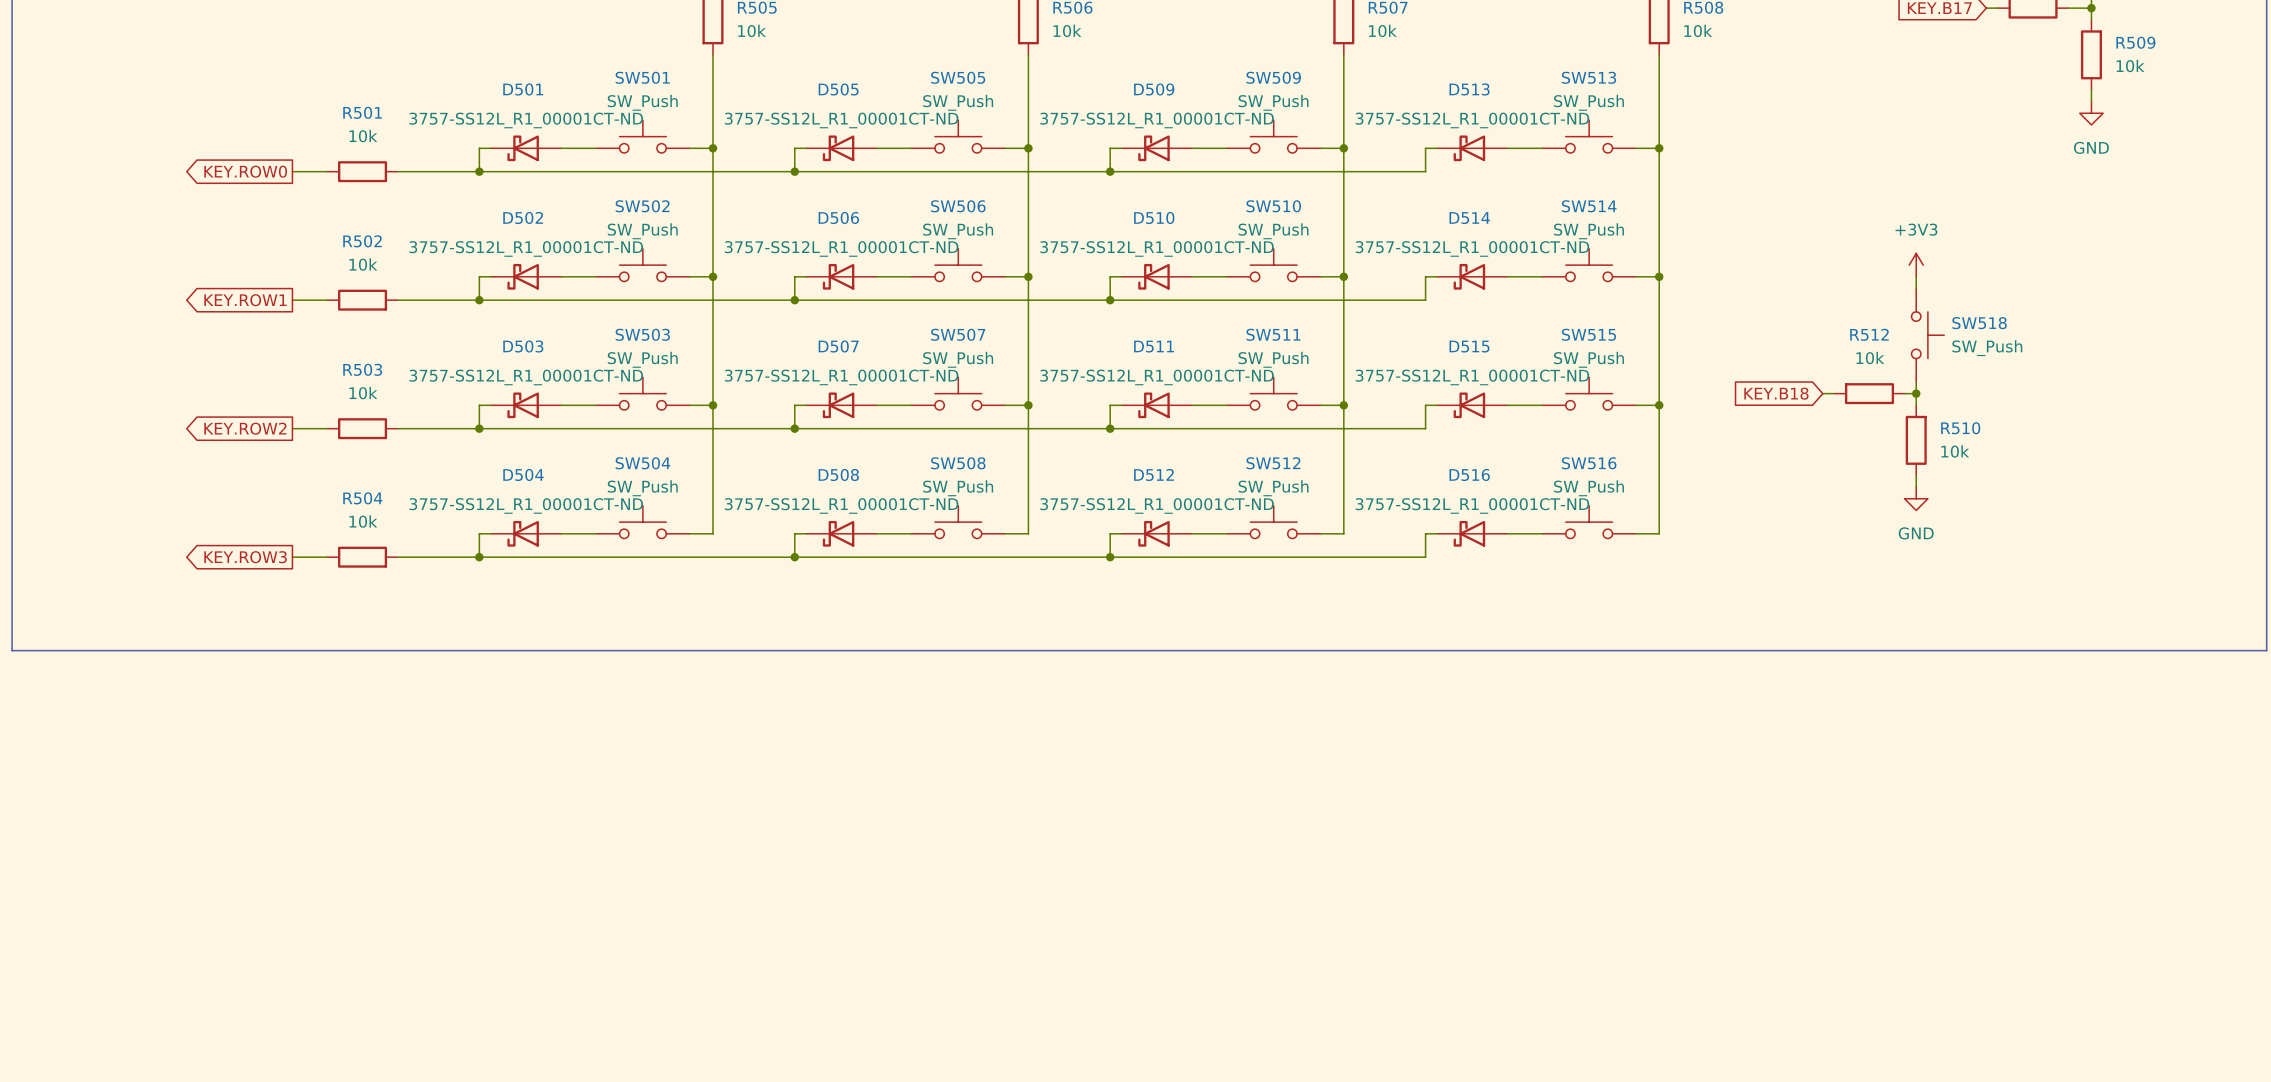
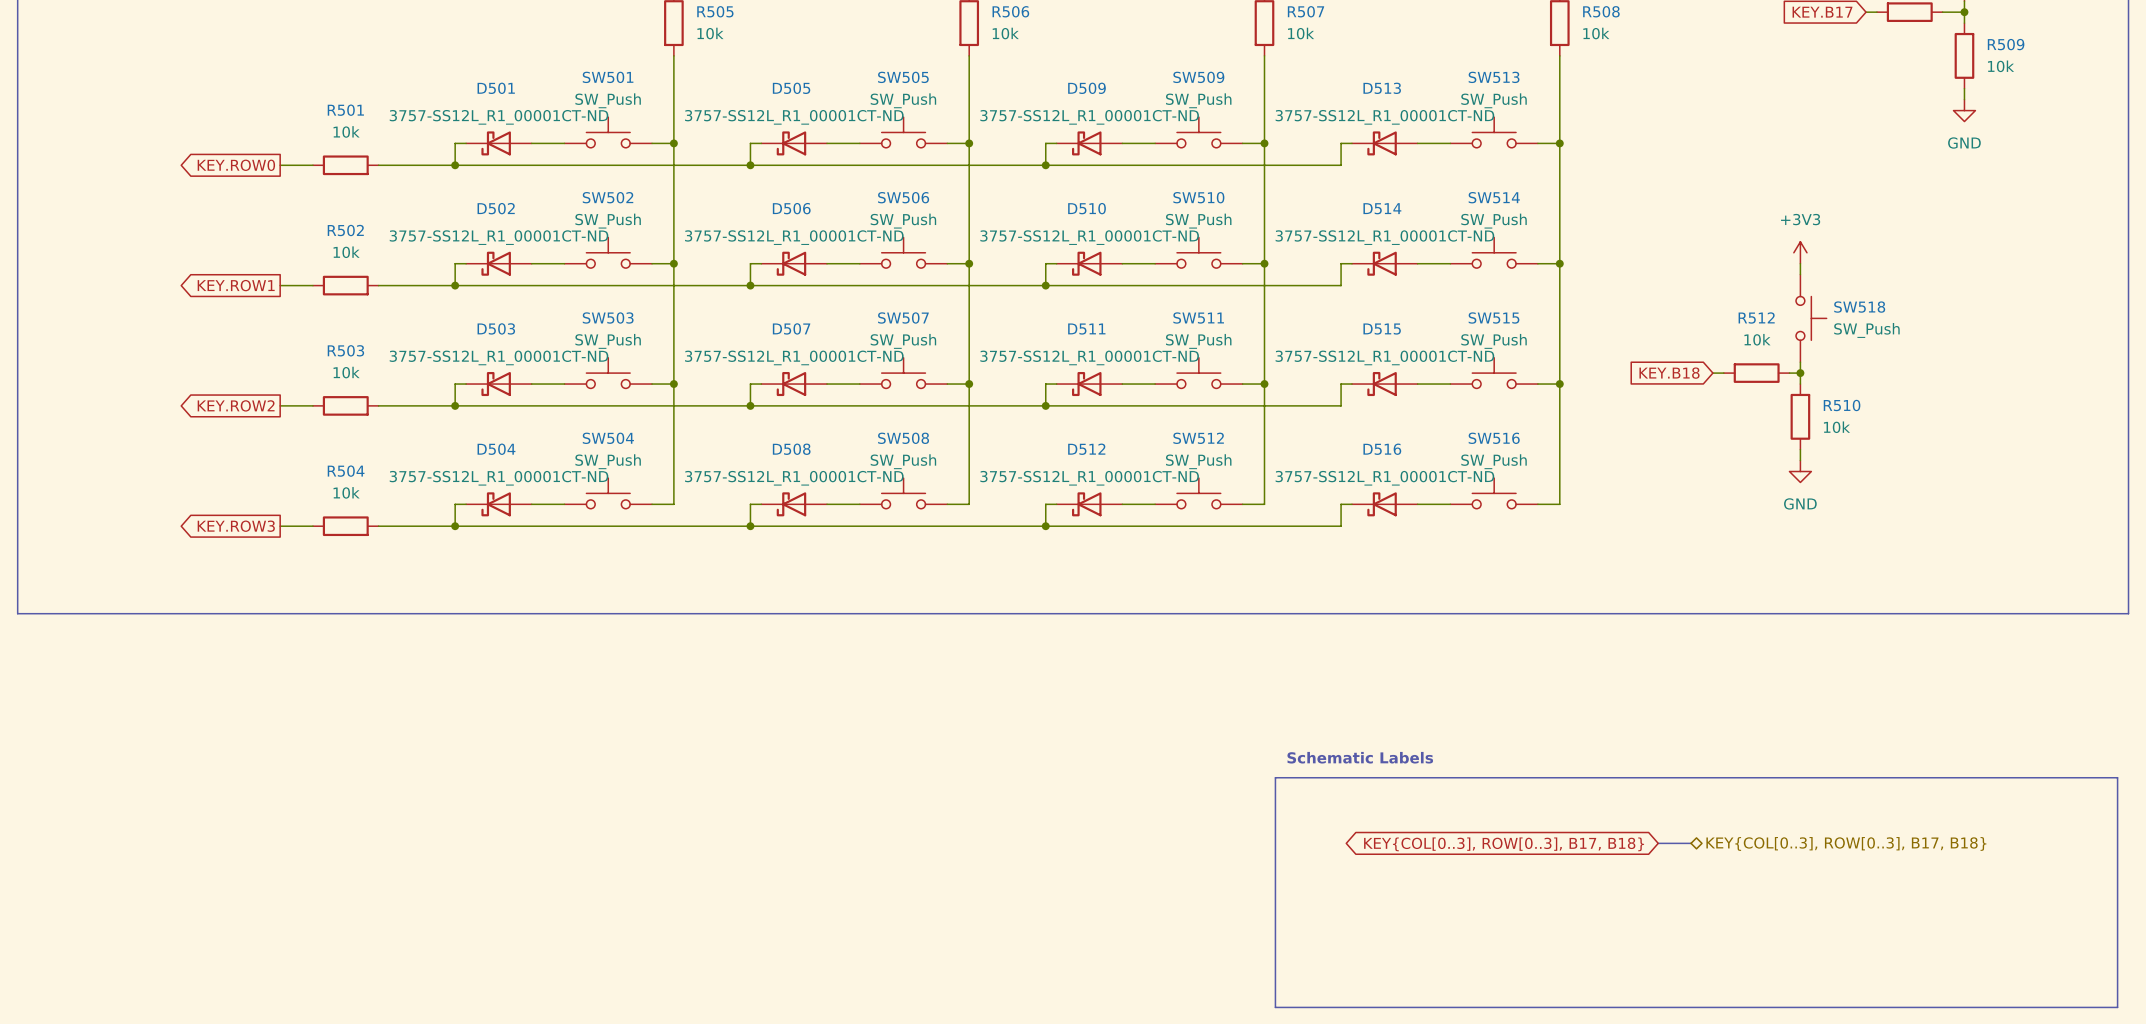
text: none -> Schematic Labels (1360, 757)
line: none -> (1275, 777) (2117, 777) (2117, 1007) (1275, 1007) (1275, 777)
bus: none -> (1658, 843) (1691, 843)
hierarchical label: none -> KEY{COL[0..3], ROW[0..3], B17, B18} (1846, 843)
global label: none -> KEY{COL[0..3], ROW[0..3], B17, B18} (1504, 844)

